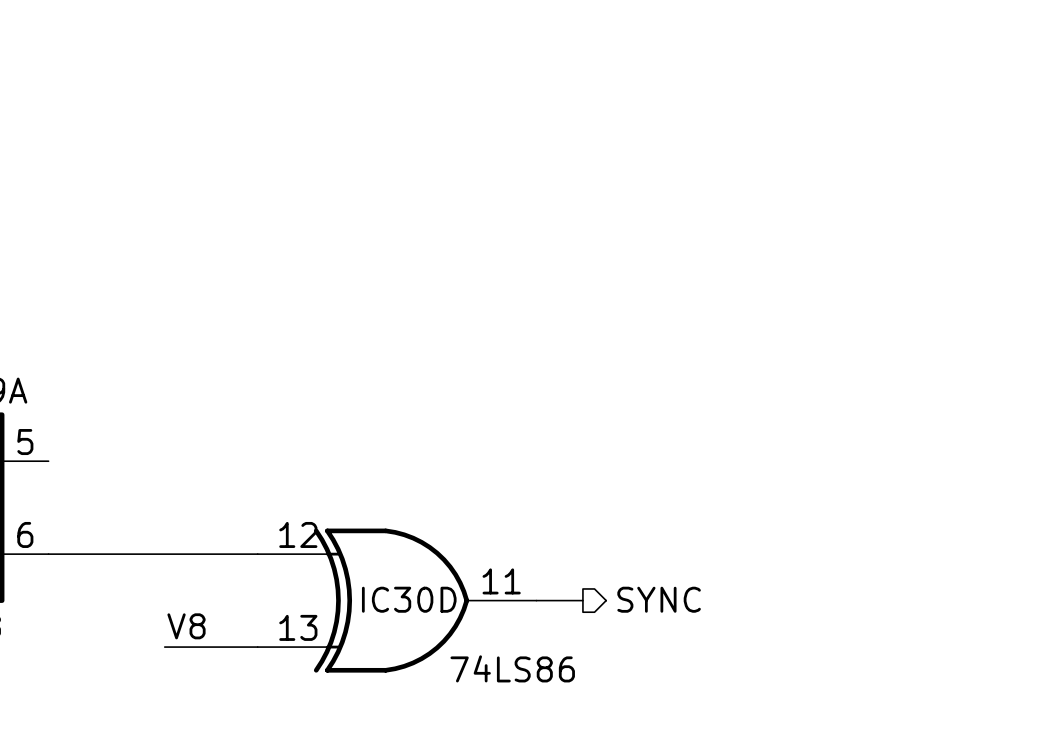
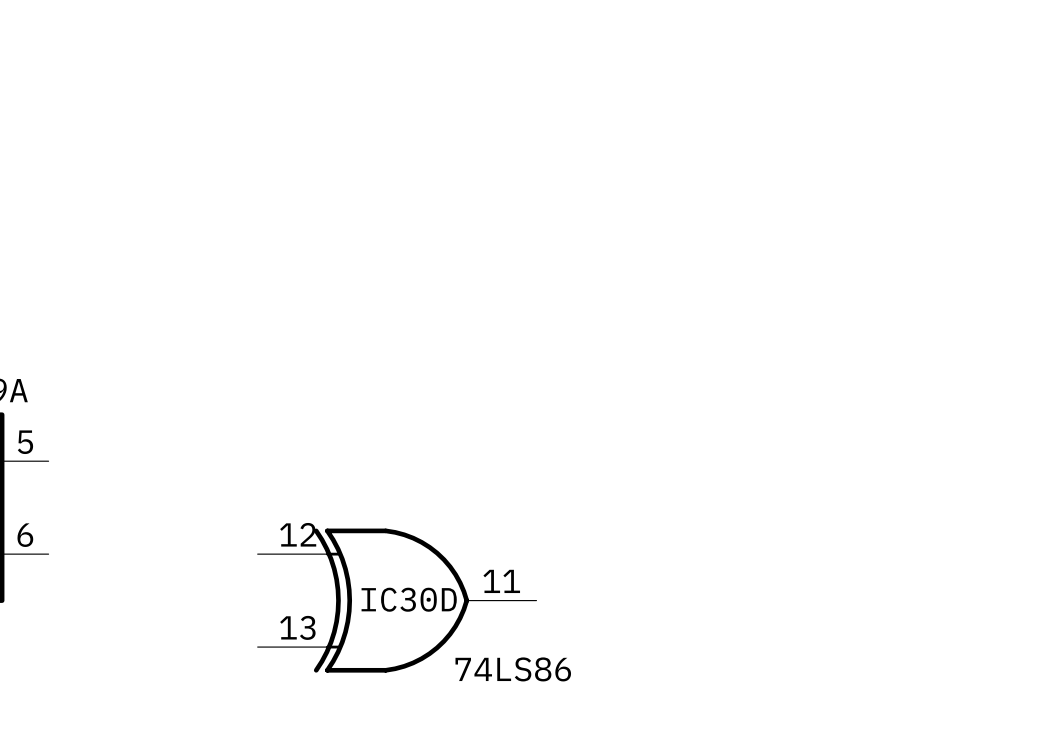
wire: (48, 554) (257, 554) -> none
hierarchical label: SYNC (659, 599) -> none
wire: (536, 600) (582, 600) -> none
label: V8 (186, 626) -> none
wire: (164, 647) (257, 647) -> none

